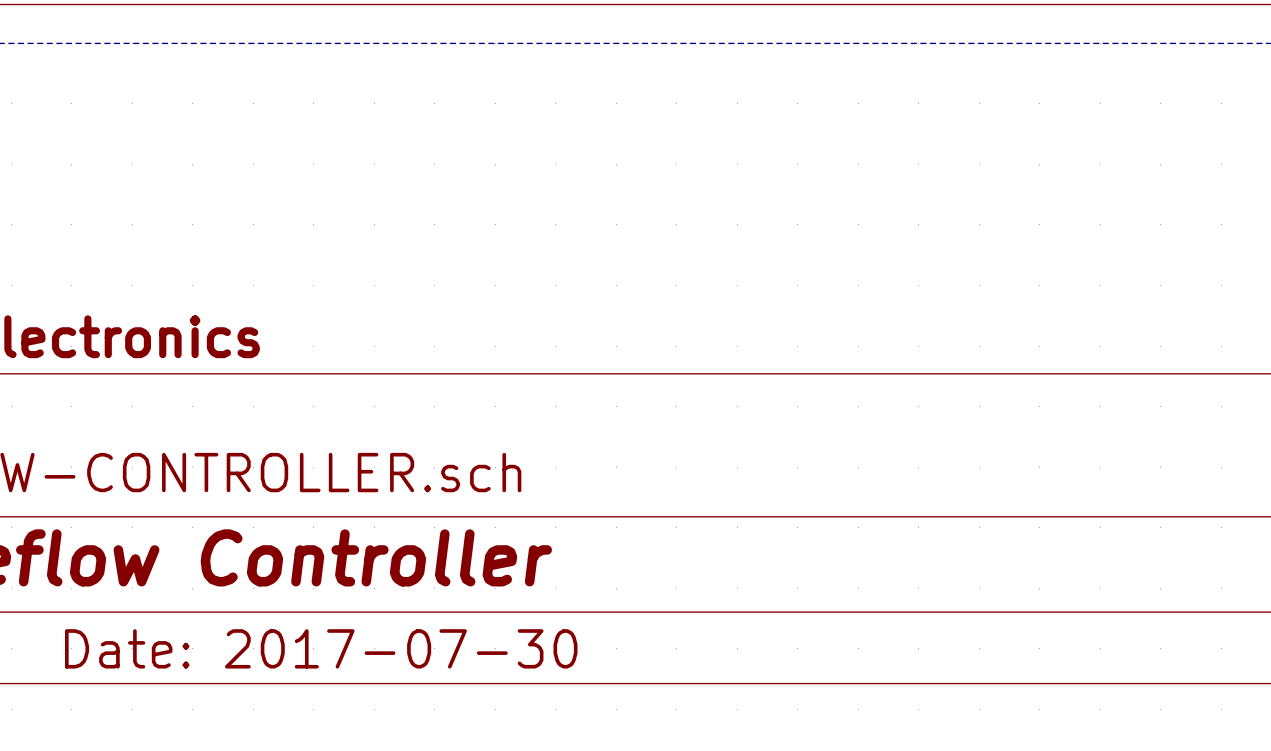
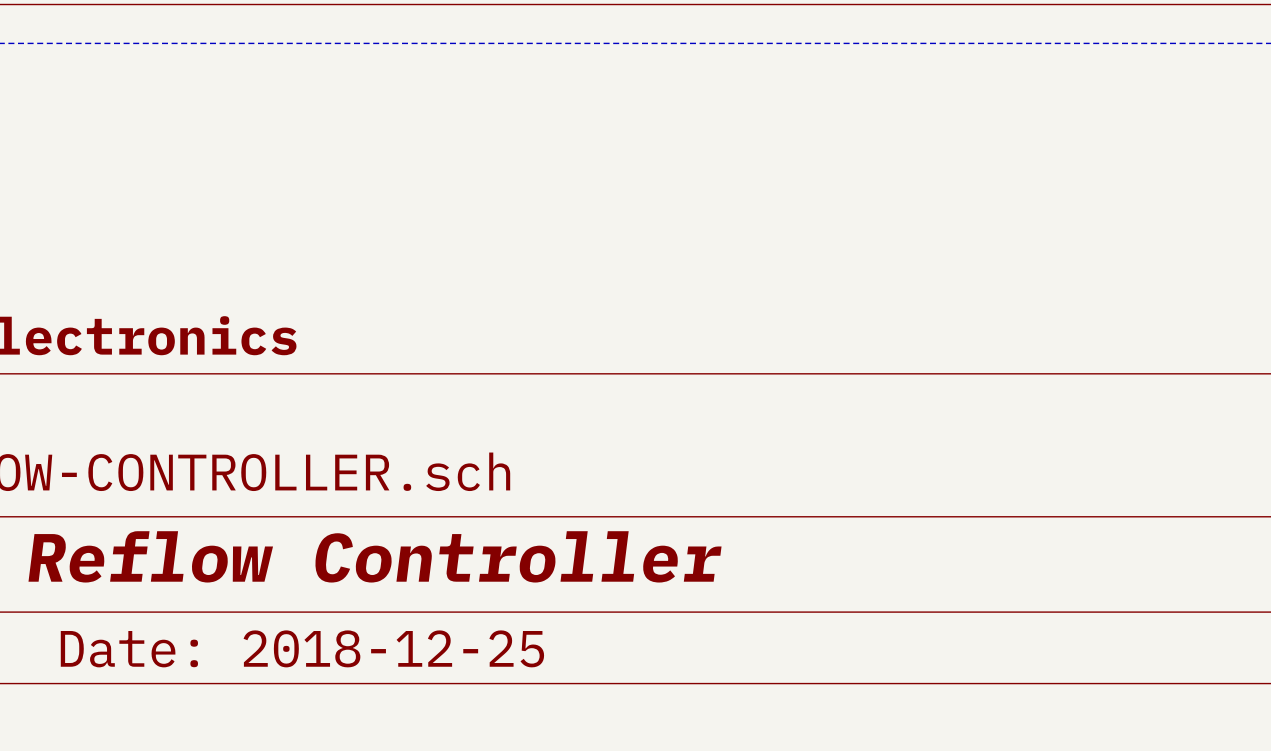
title block: Date: 2017-07-30 (321, 648) -> Date: 2018-12-25 (302, 648)

